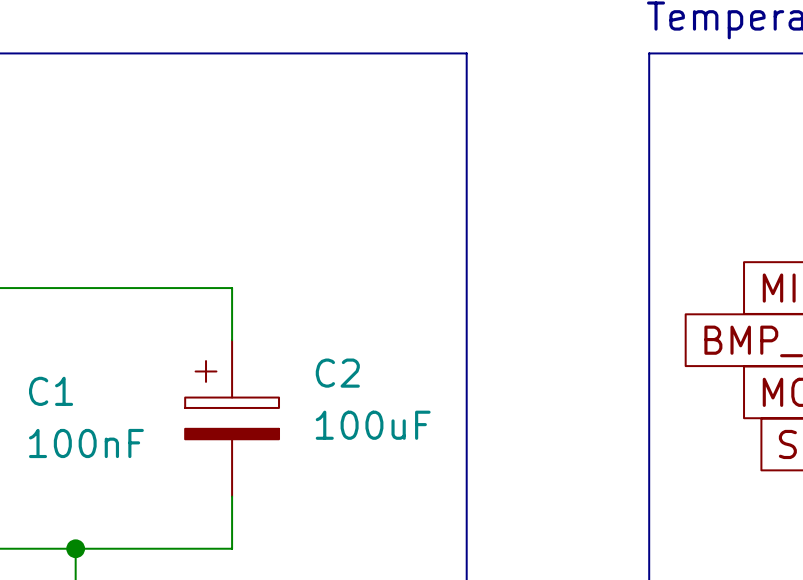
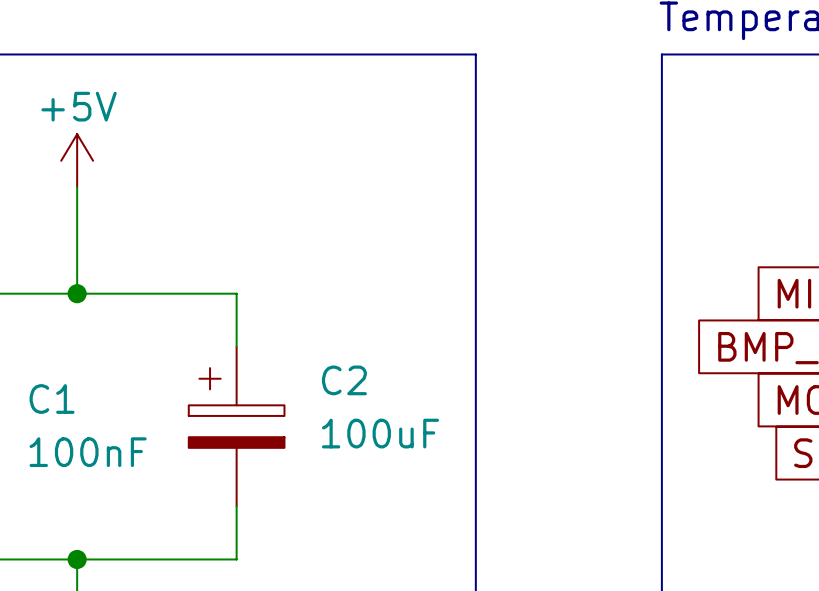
power symbol: none -> +5V (77, 160)
wire: none -> (77, 187) (77, 293)
junction: none -> (77, 293)

